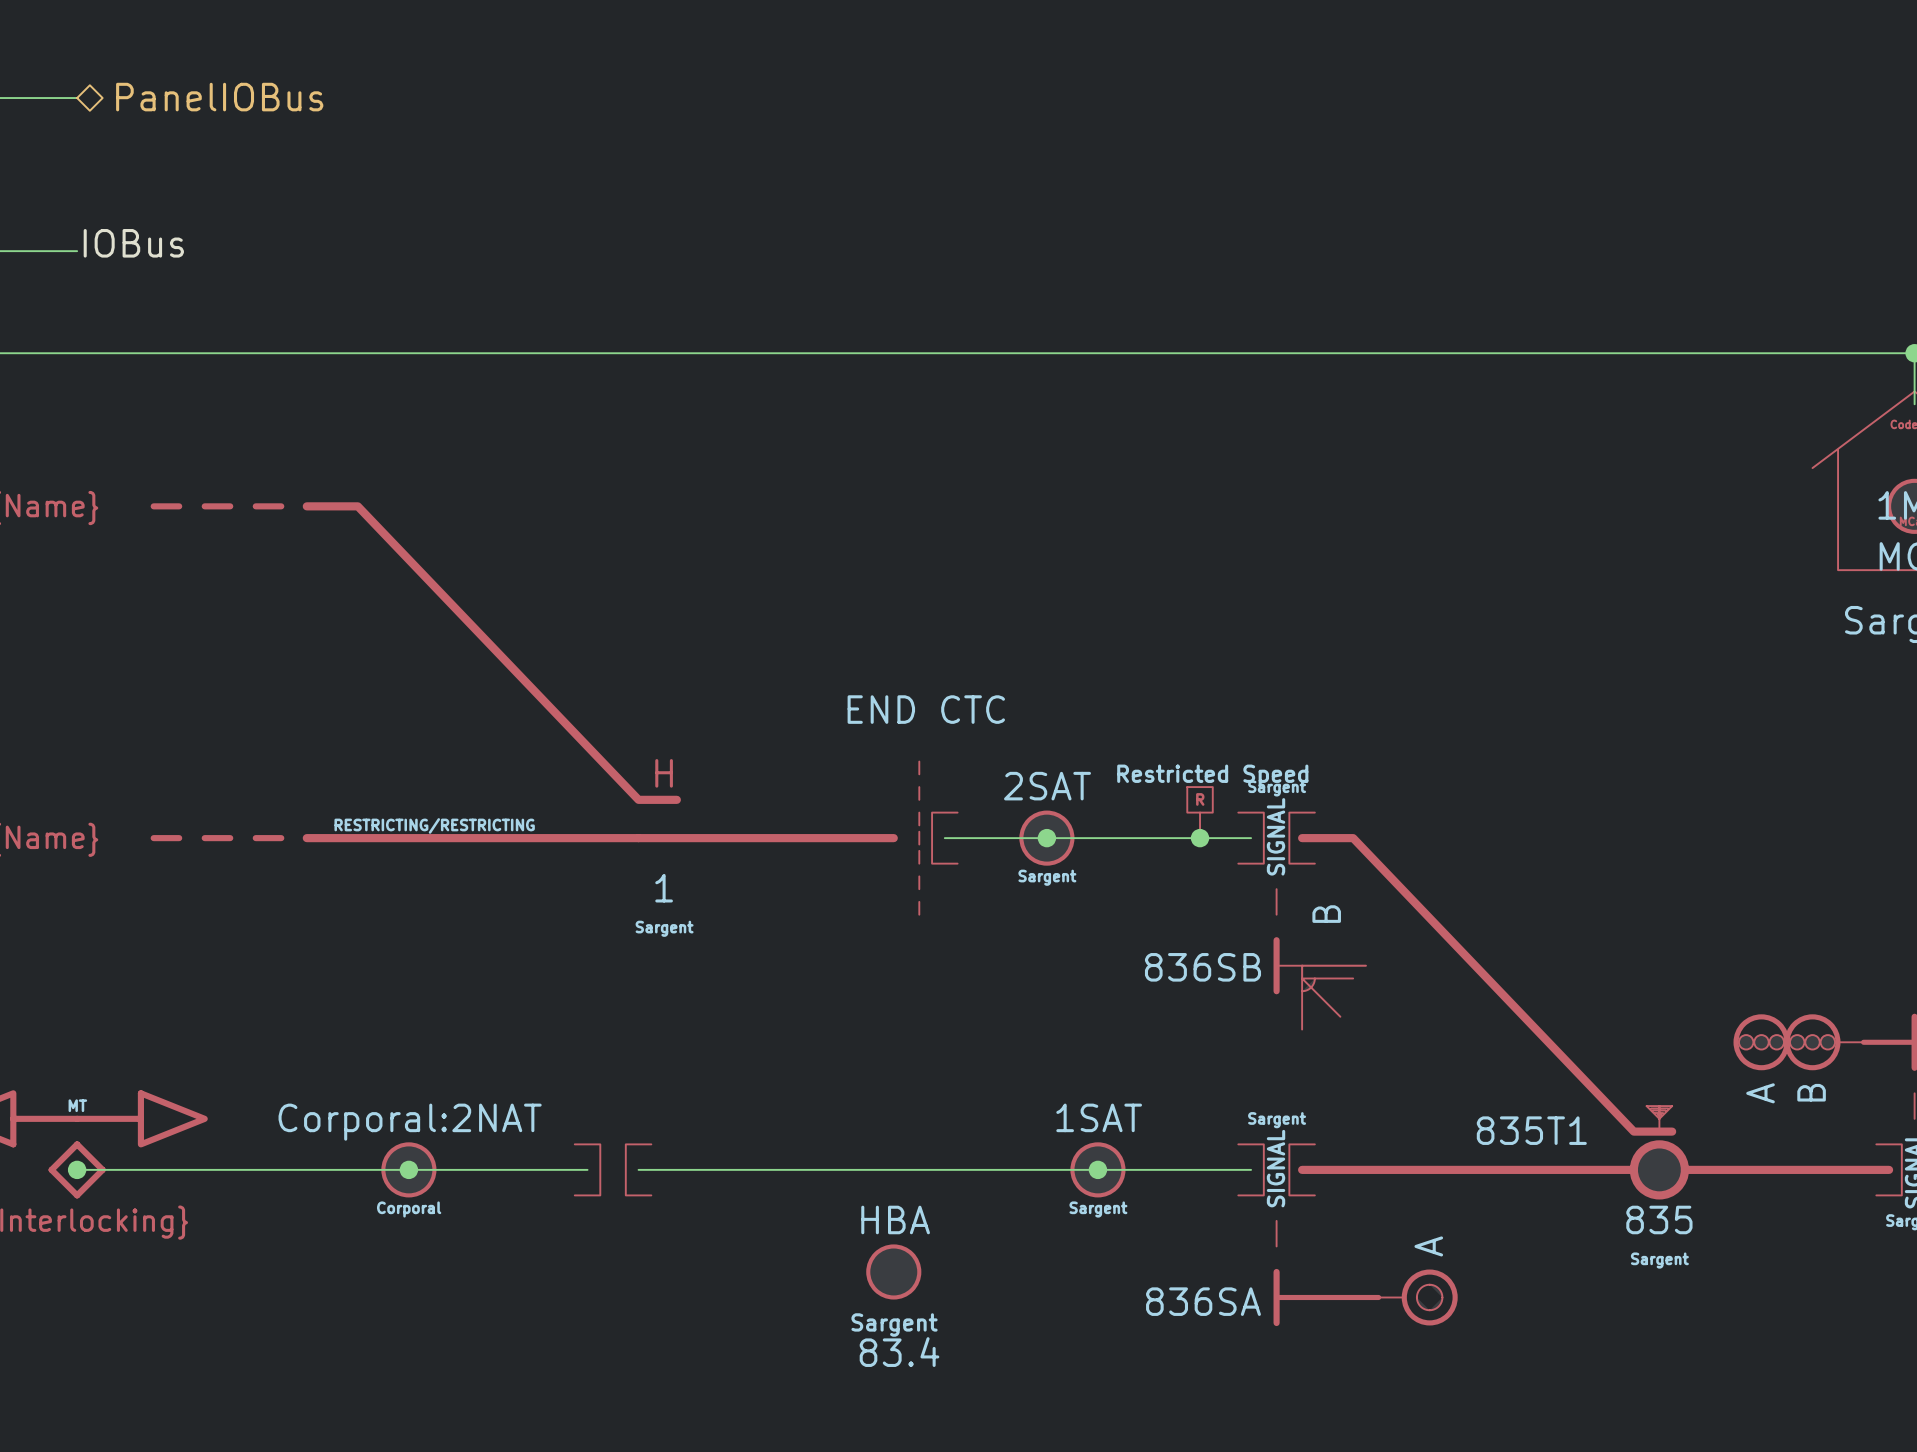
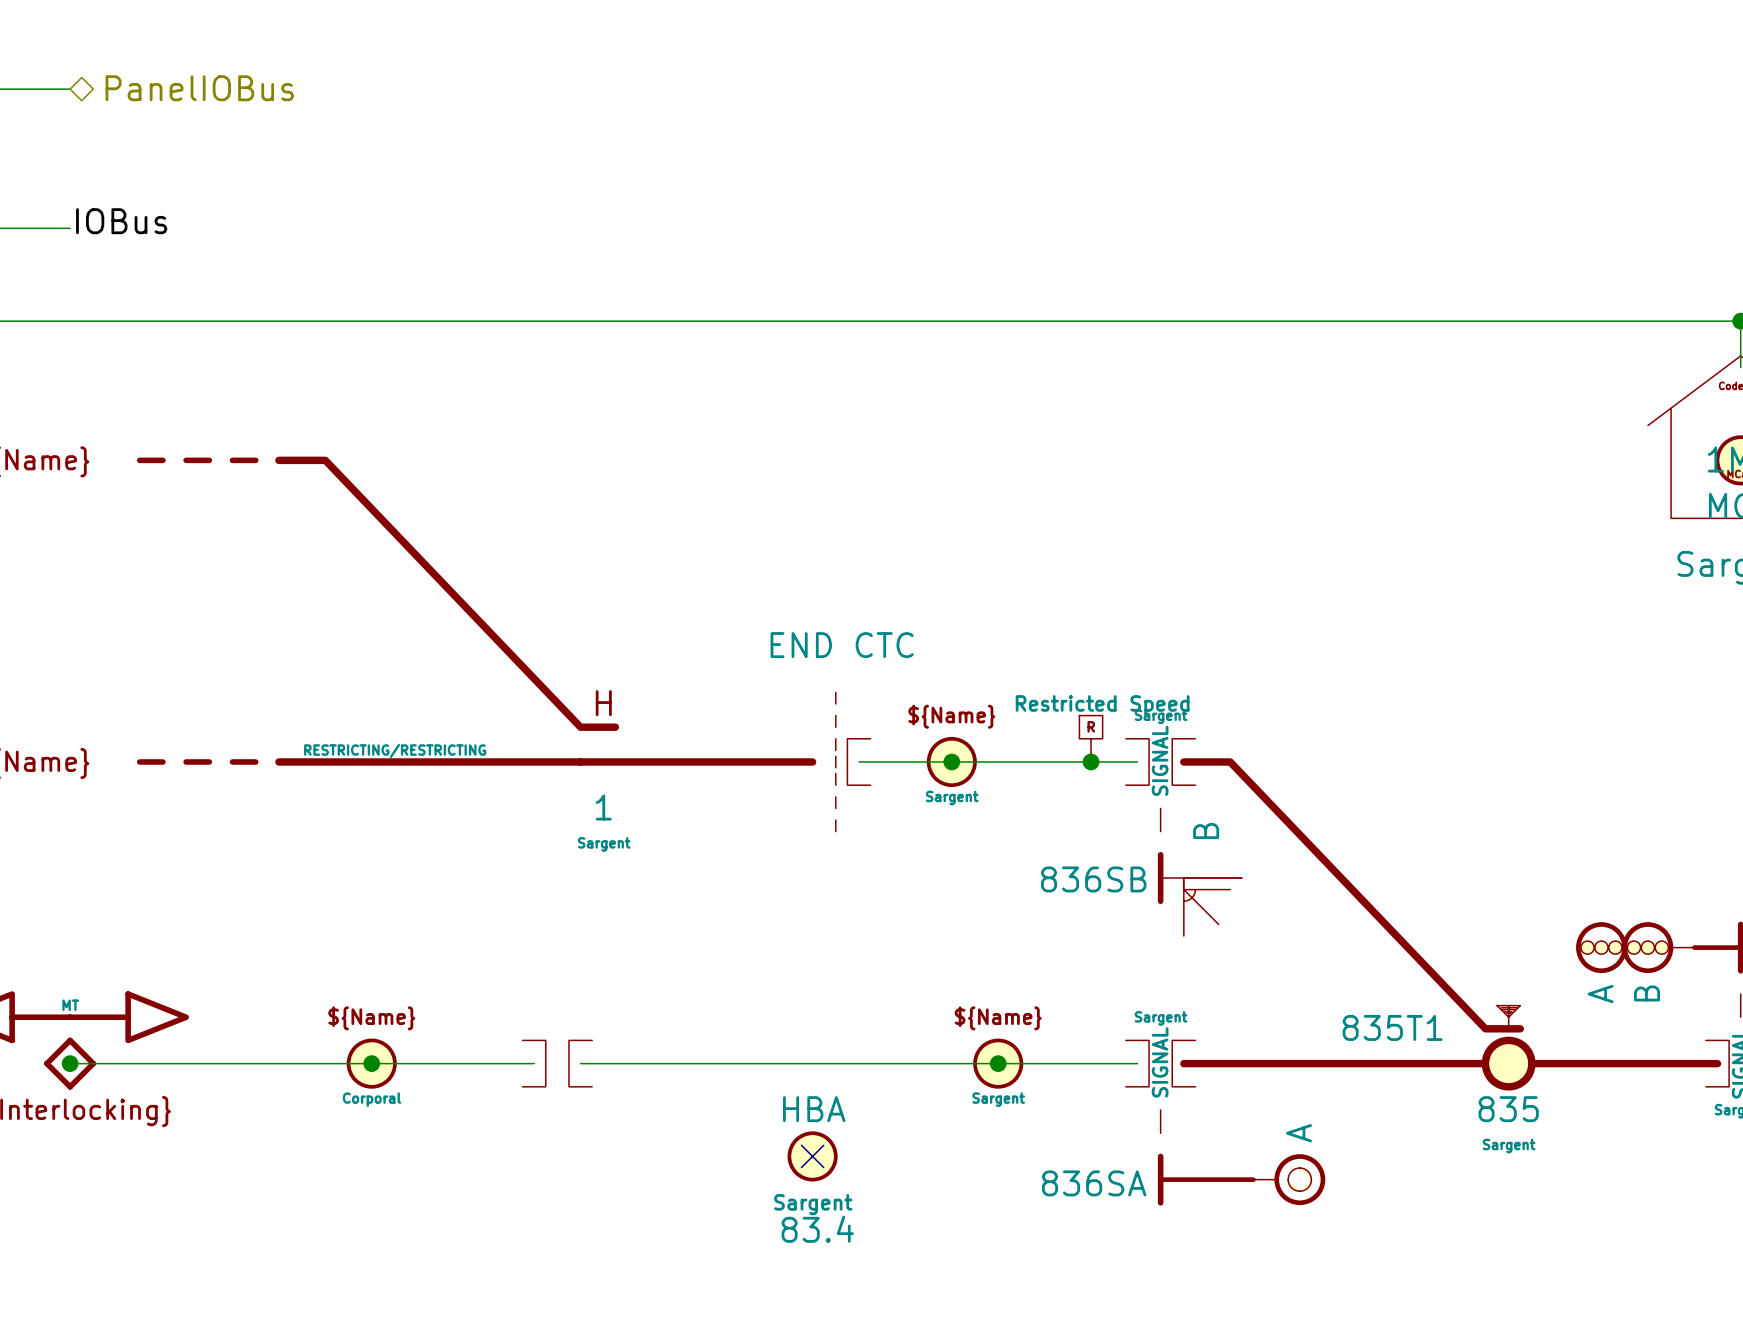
part value: 2SAT (1047, 786) -> none
part text: none -> ${Name} (951, 716)
part value: 1SAT (1099, 1117) -> none
part text: none -> ${Name} (371, 1018)
part text: none -> ${Name} (998, 1018)
part value: Corporal:2NAT (410, 1122) -> none
no-connect mark: none -> (812, 1156)

